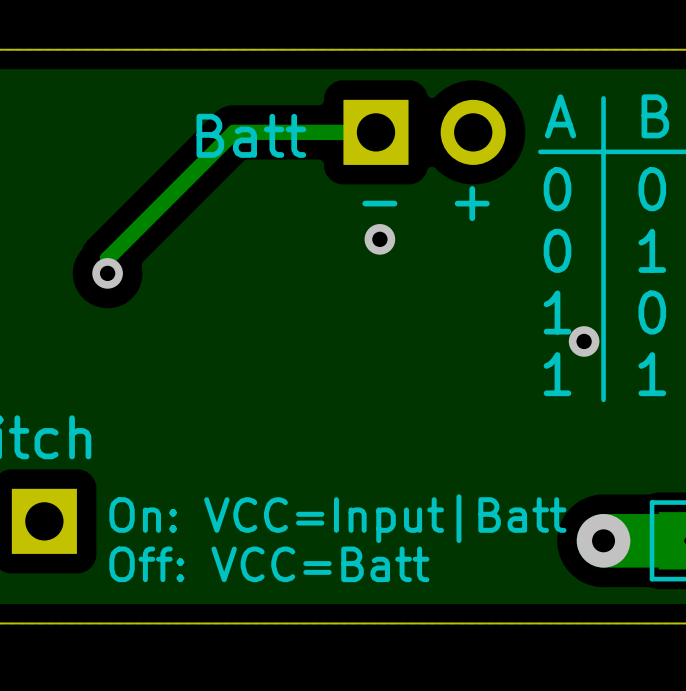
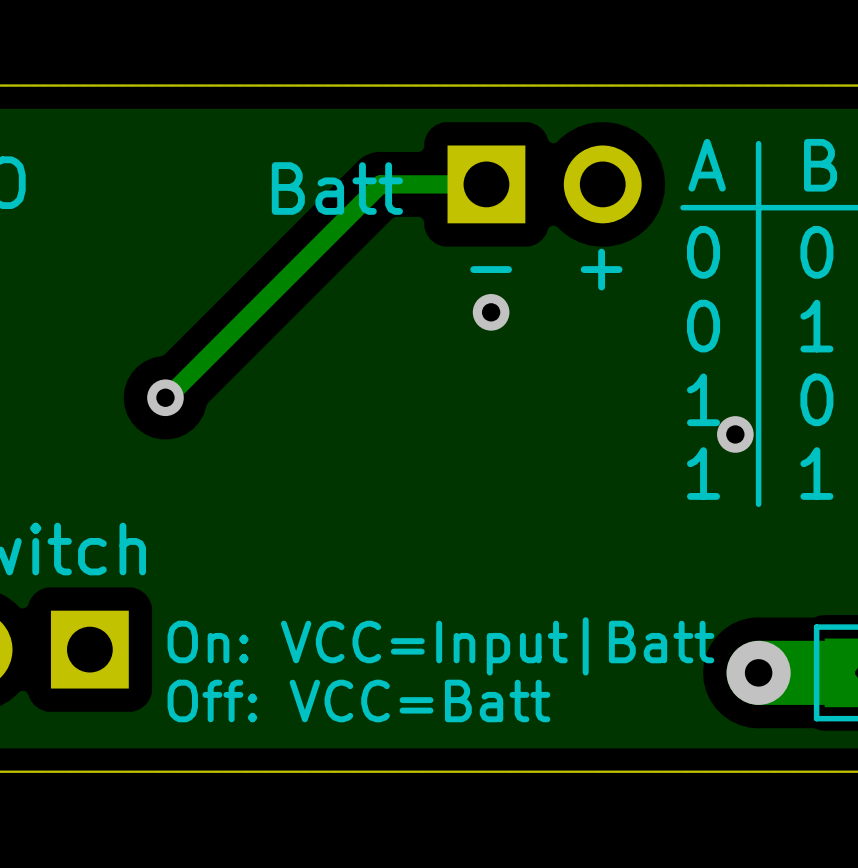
track: (287, 132) (234, 132) (107, 258) (107, 273) -> (380, 184) (165, 397)
via position: (107, 273) -> (165, 397)

